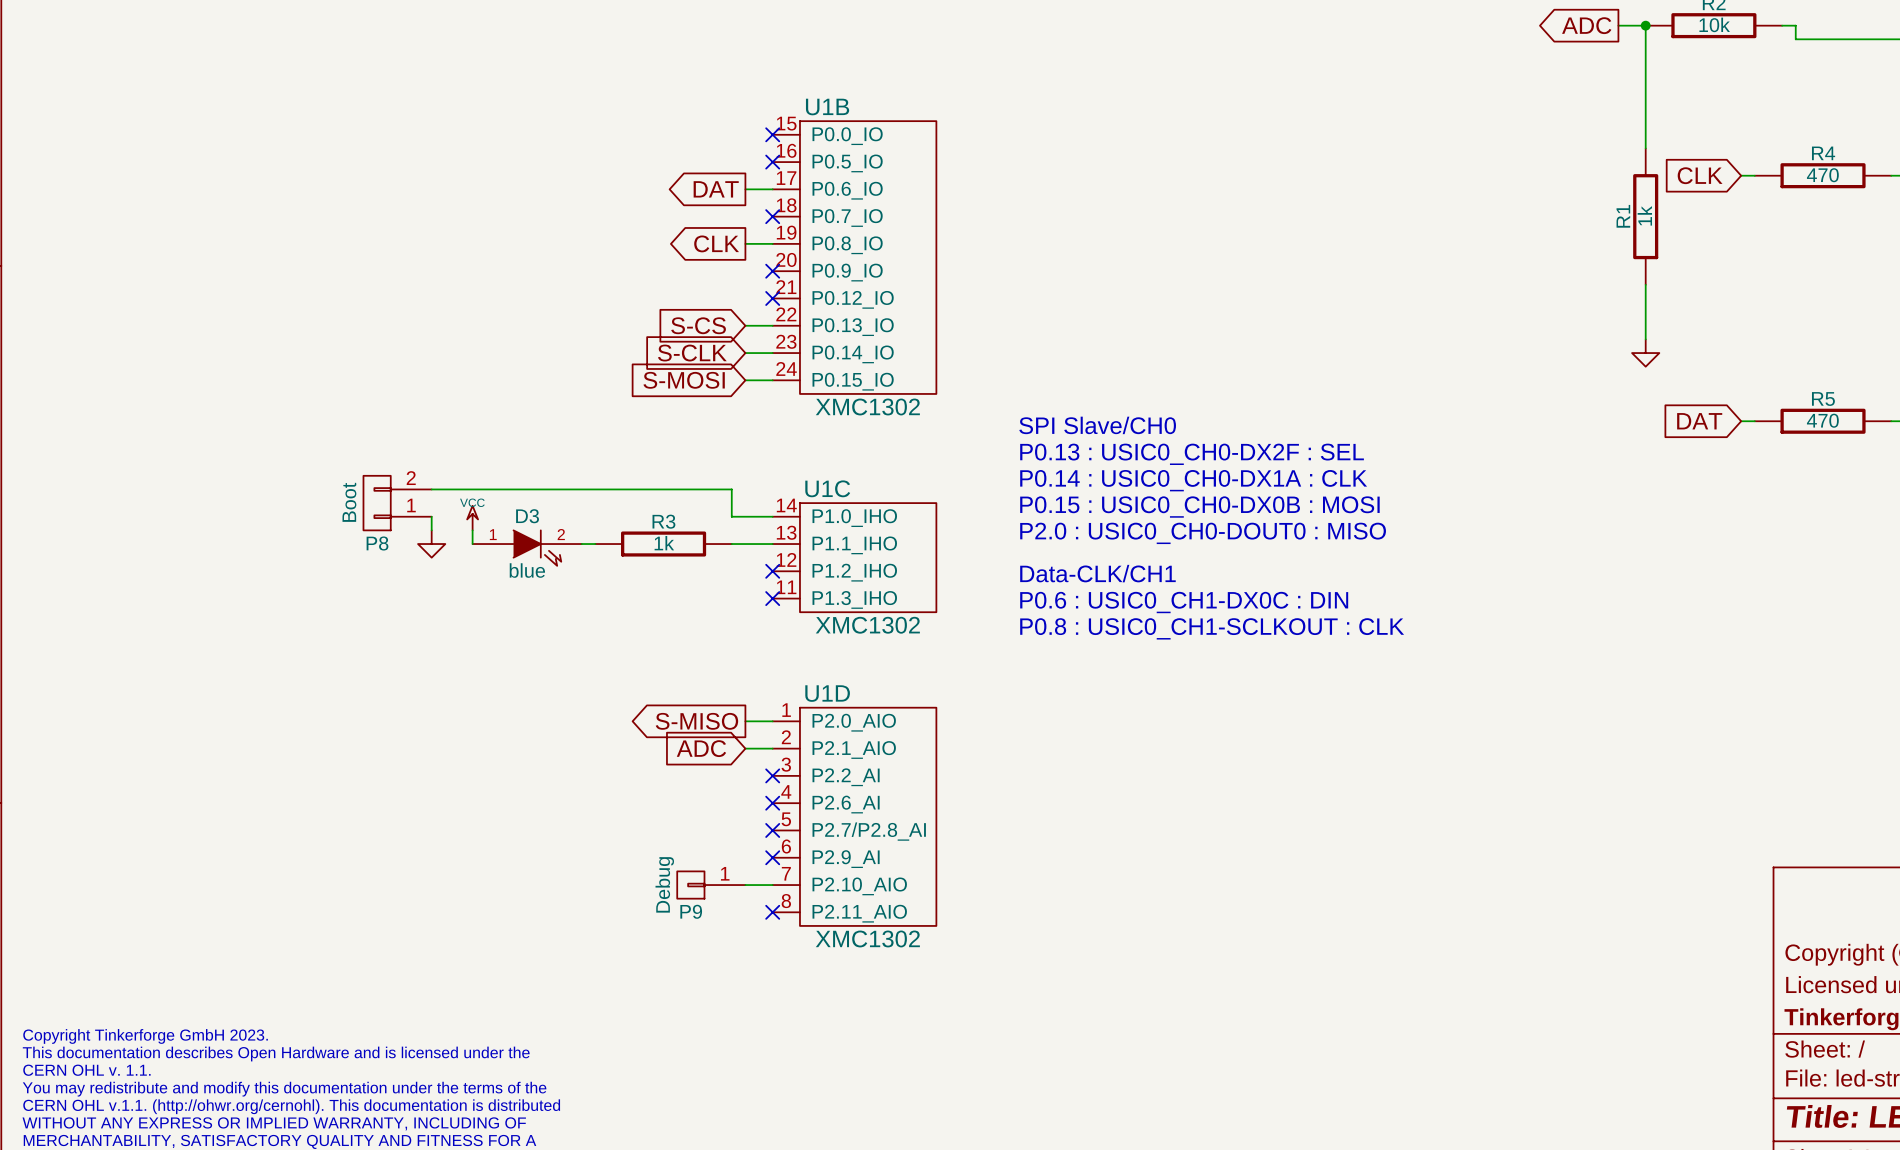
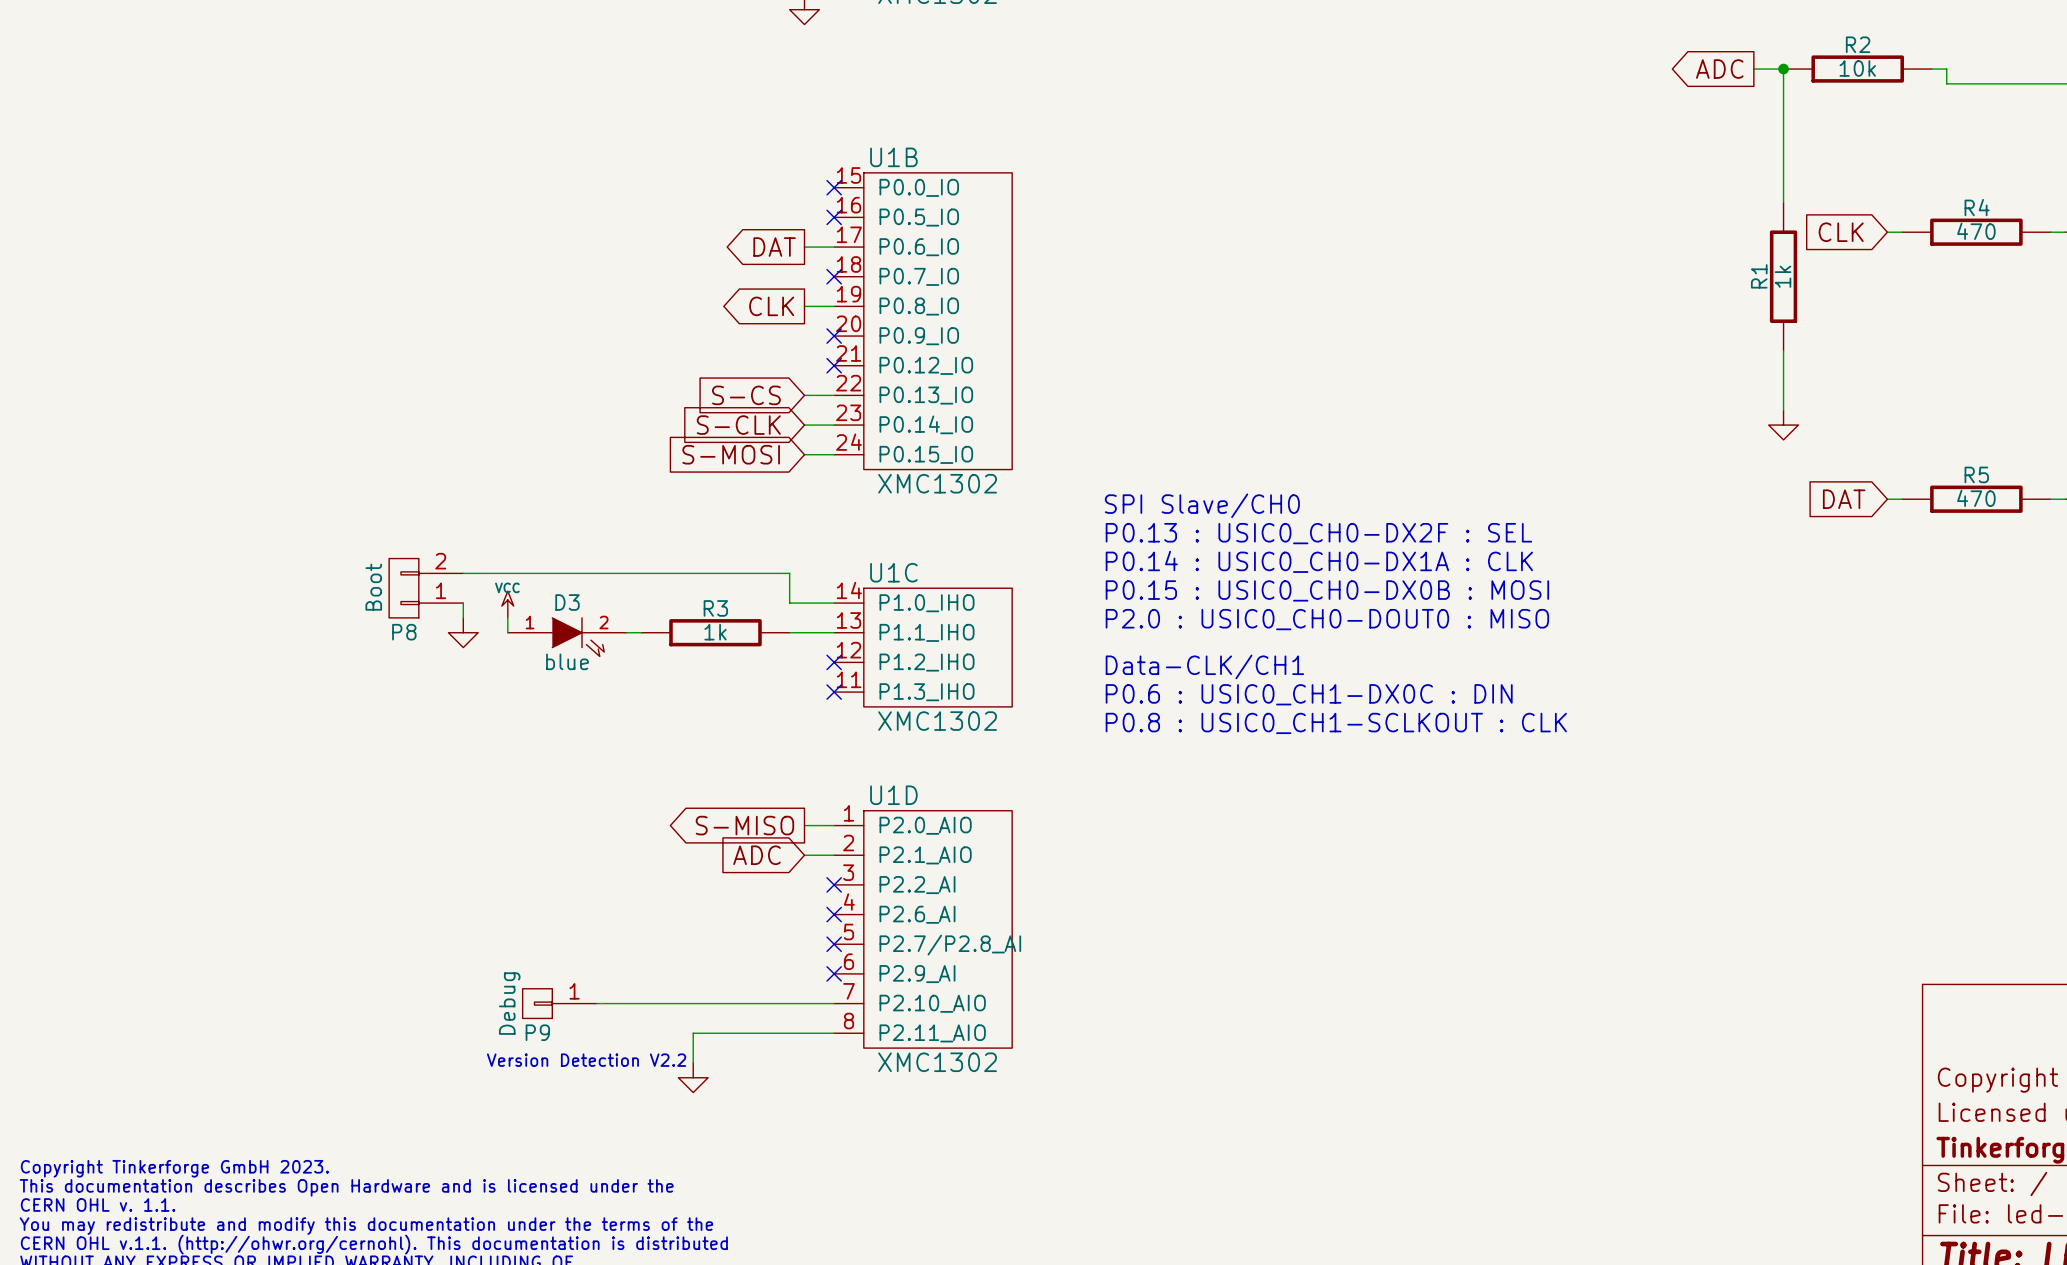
wire: none -> (596, 1003) (804, 1003)
P9 position: (711, 885) -> (559, 1003)
wire: none -> (834, 1033) (693, 1033) (693, 1062)
no-connect mark: (772, 912) -> none
text: none -> Version Detection V2.2 (586, 1060)
power symbol: none -> (693, 1077)

